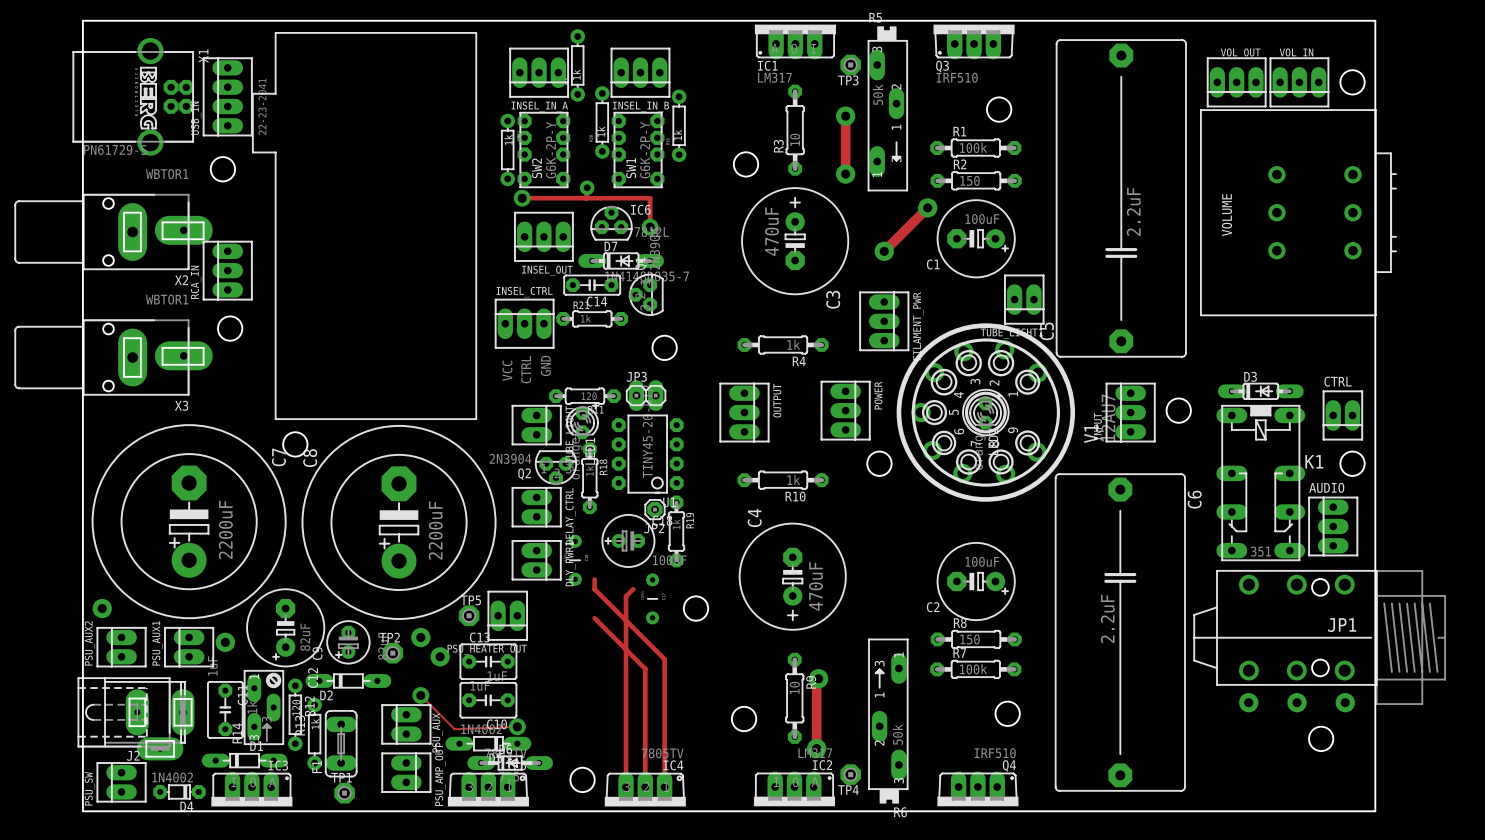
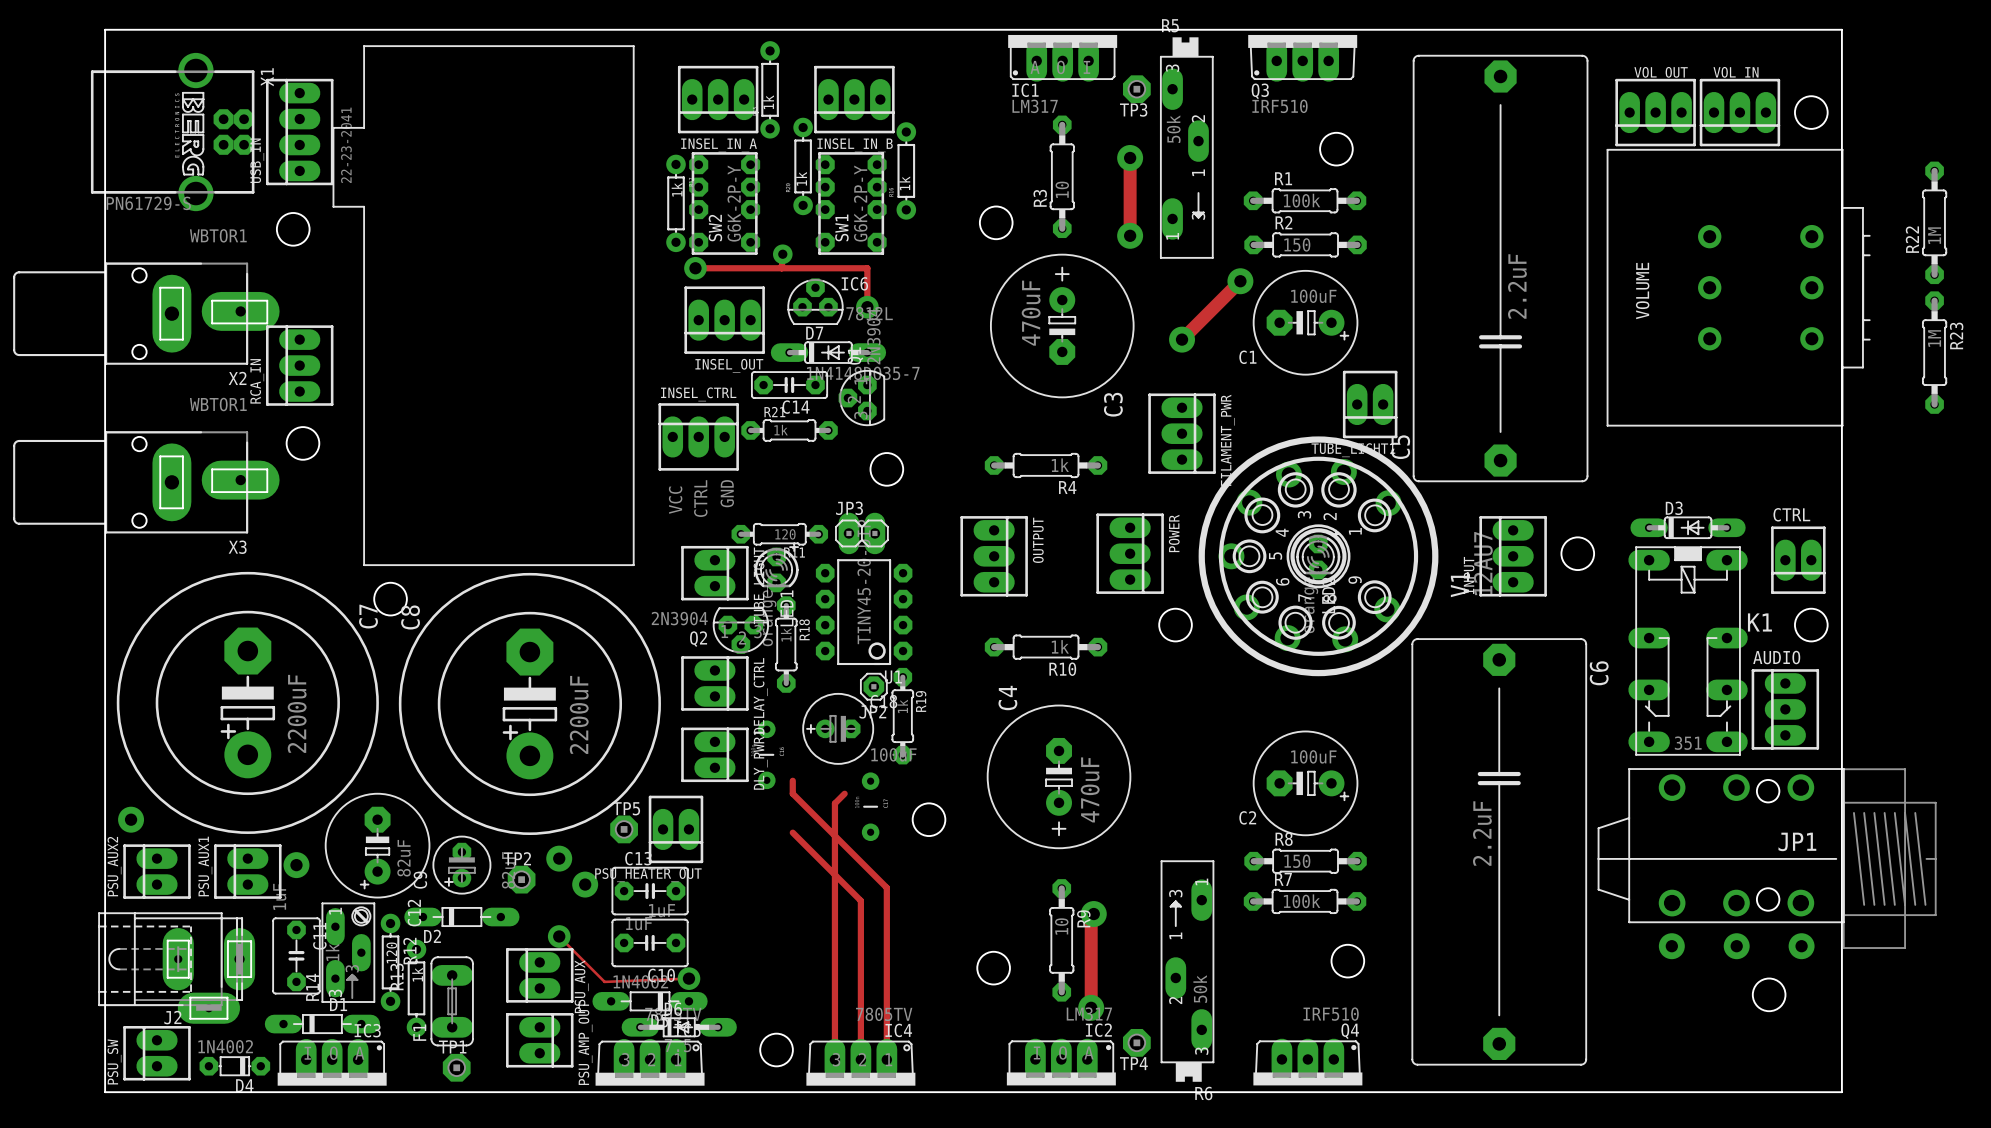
R22: none -> 1M (1934, 222)
R23: none -> 1M (1934, 352)

